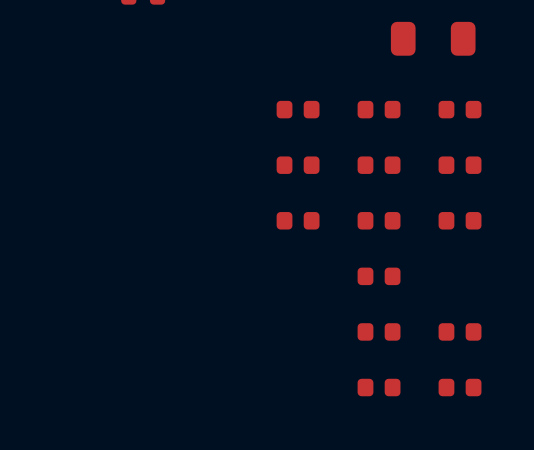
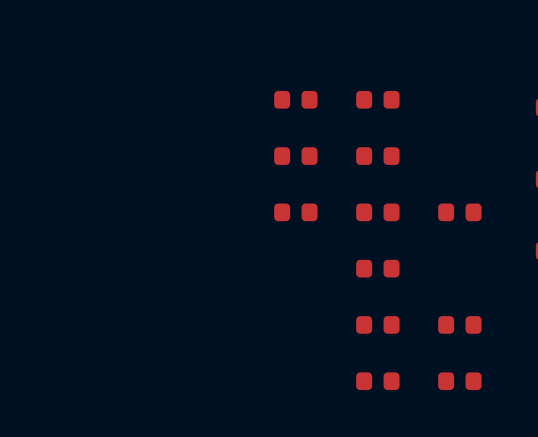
part: (433, 38) -> none
part: (460, 109) -> none
part: (460, 165) -> none

